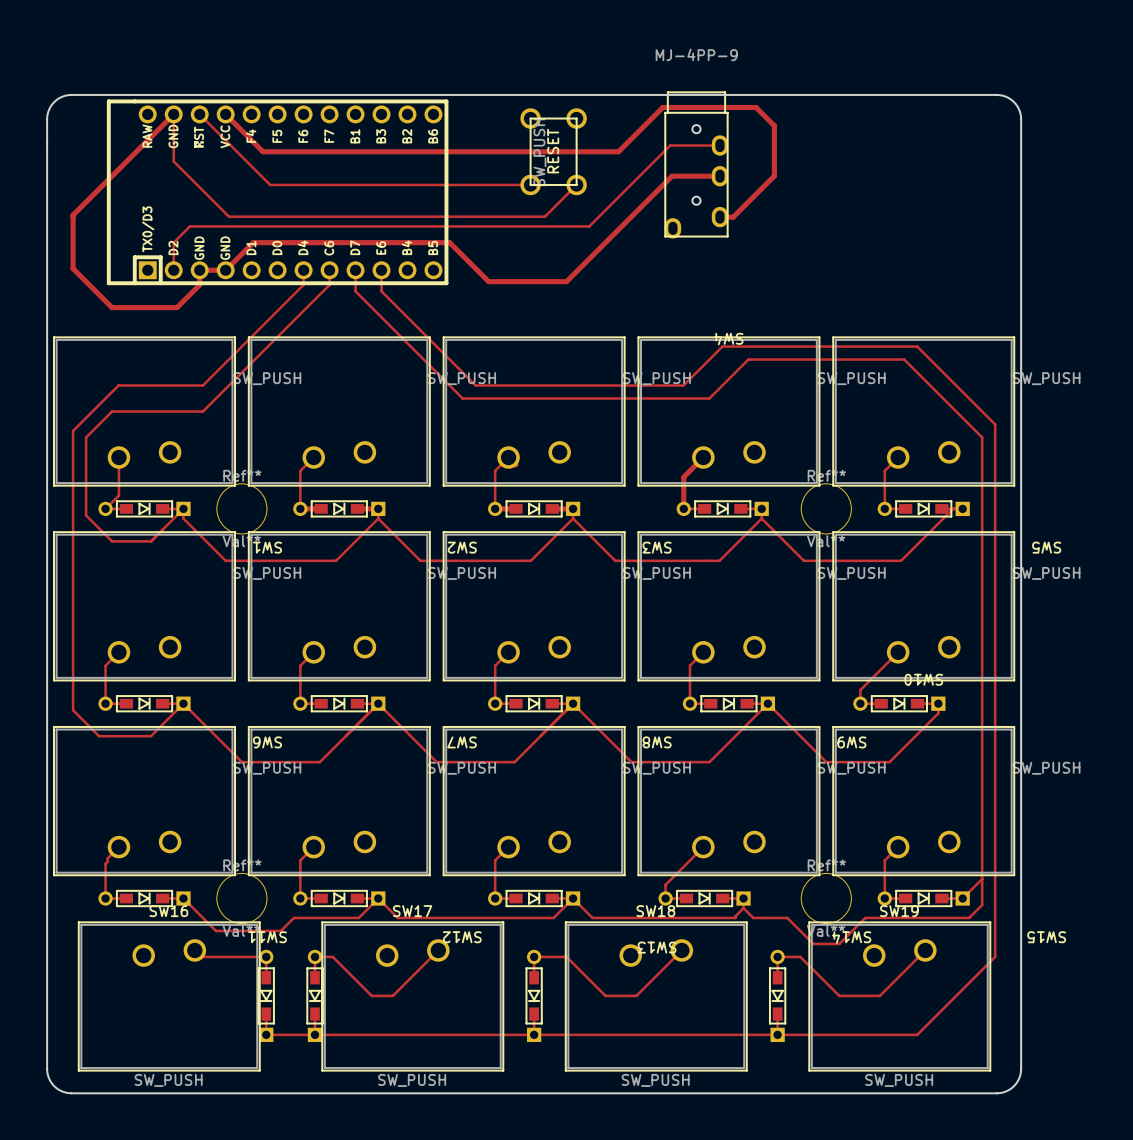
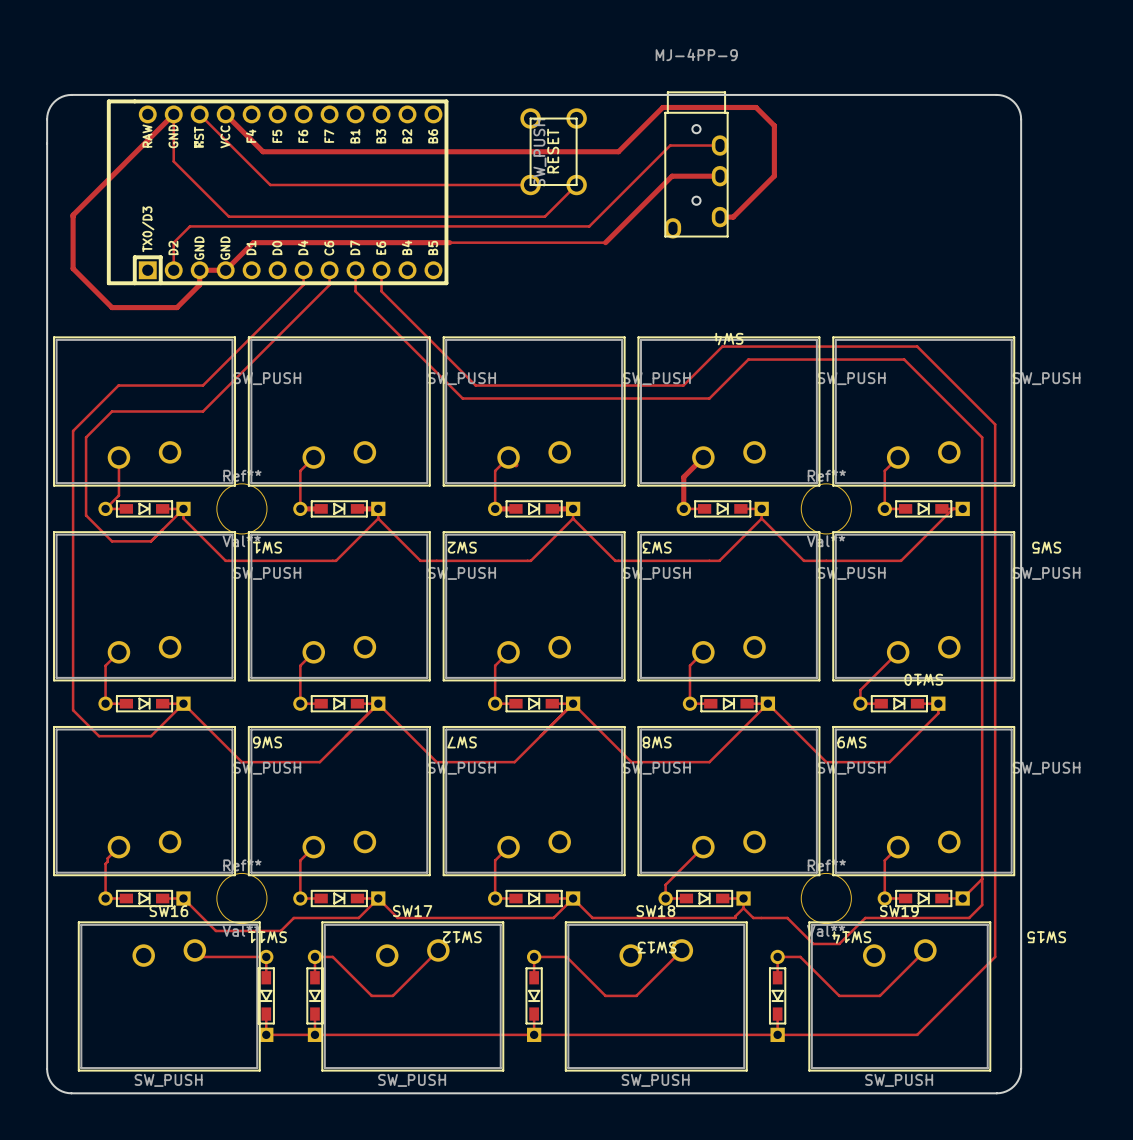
track: (449, 242) (488, 281) (566, 281) (605, 242) -> (449, 242) (605, 242)

